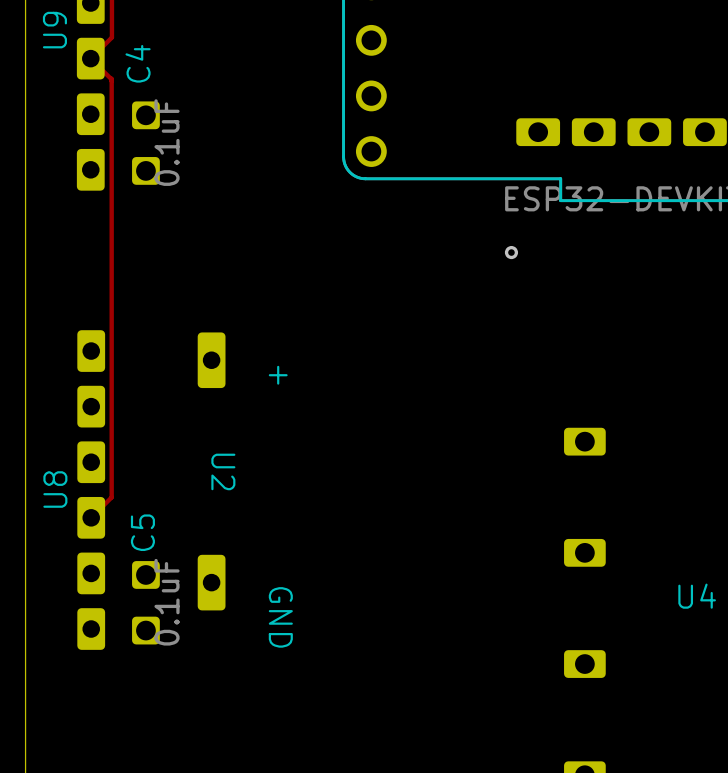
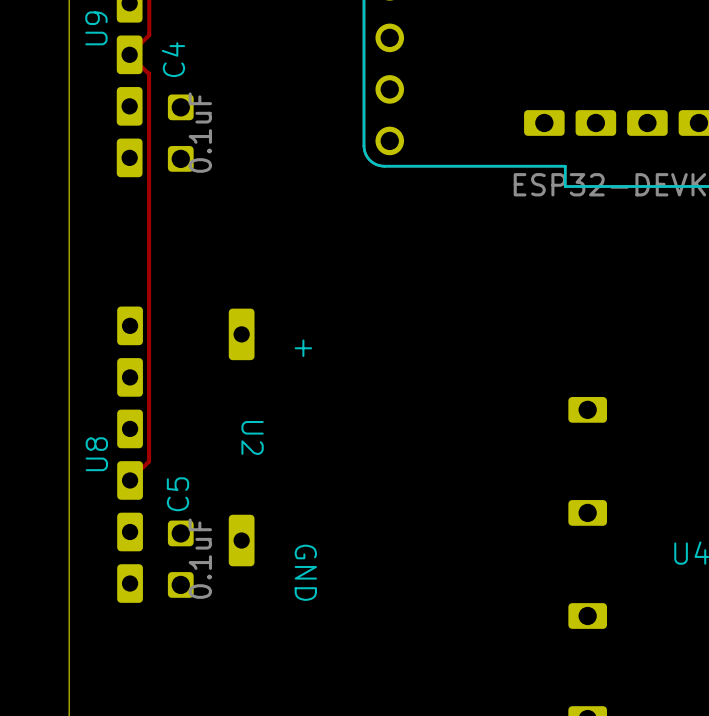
via: (511, 252) -> none

